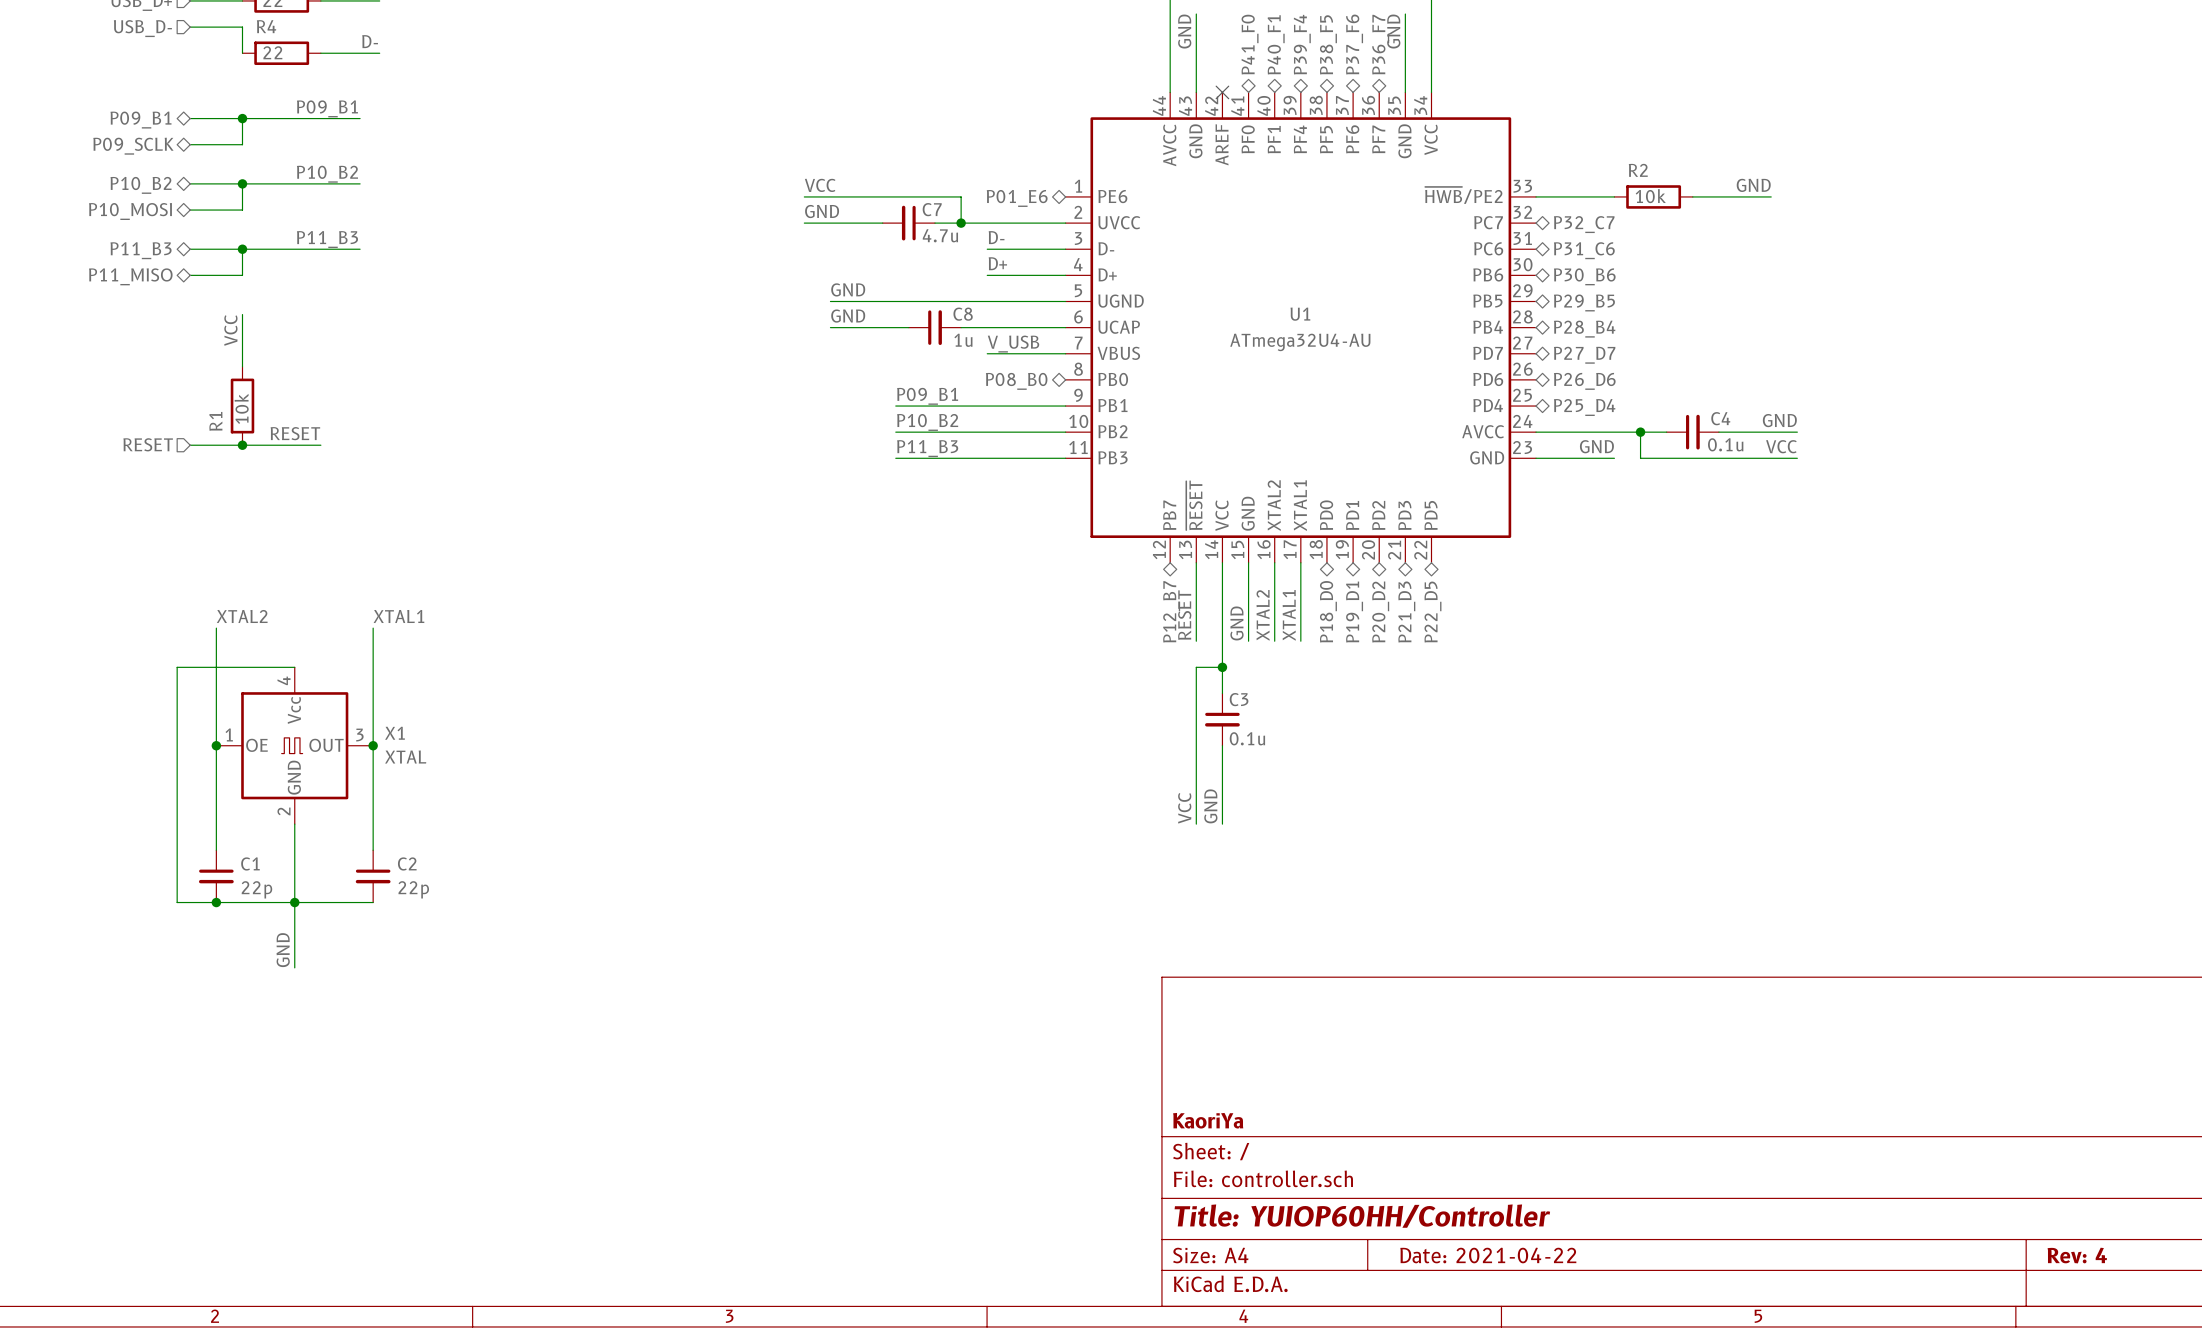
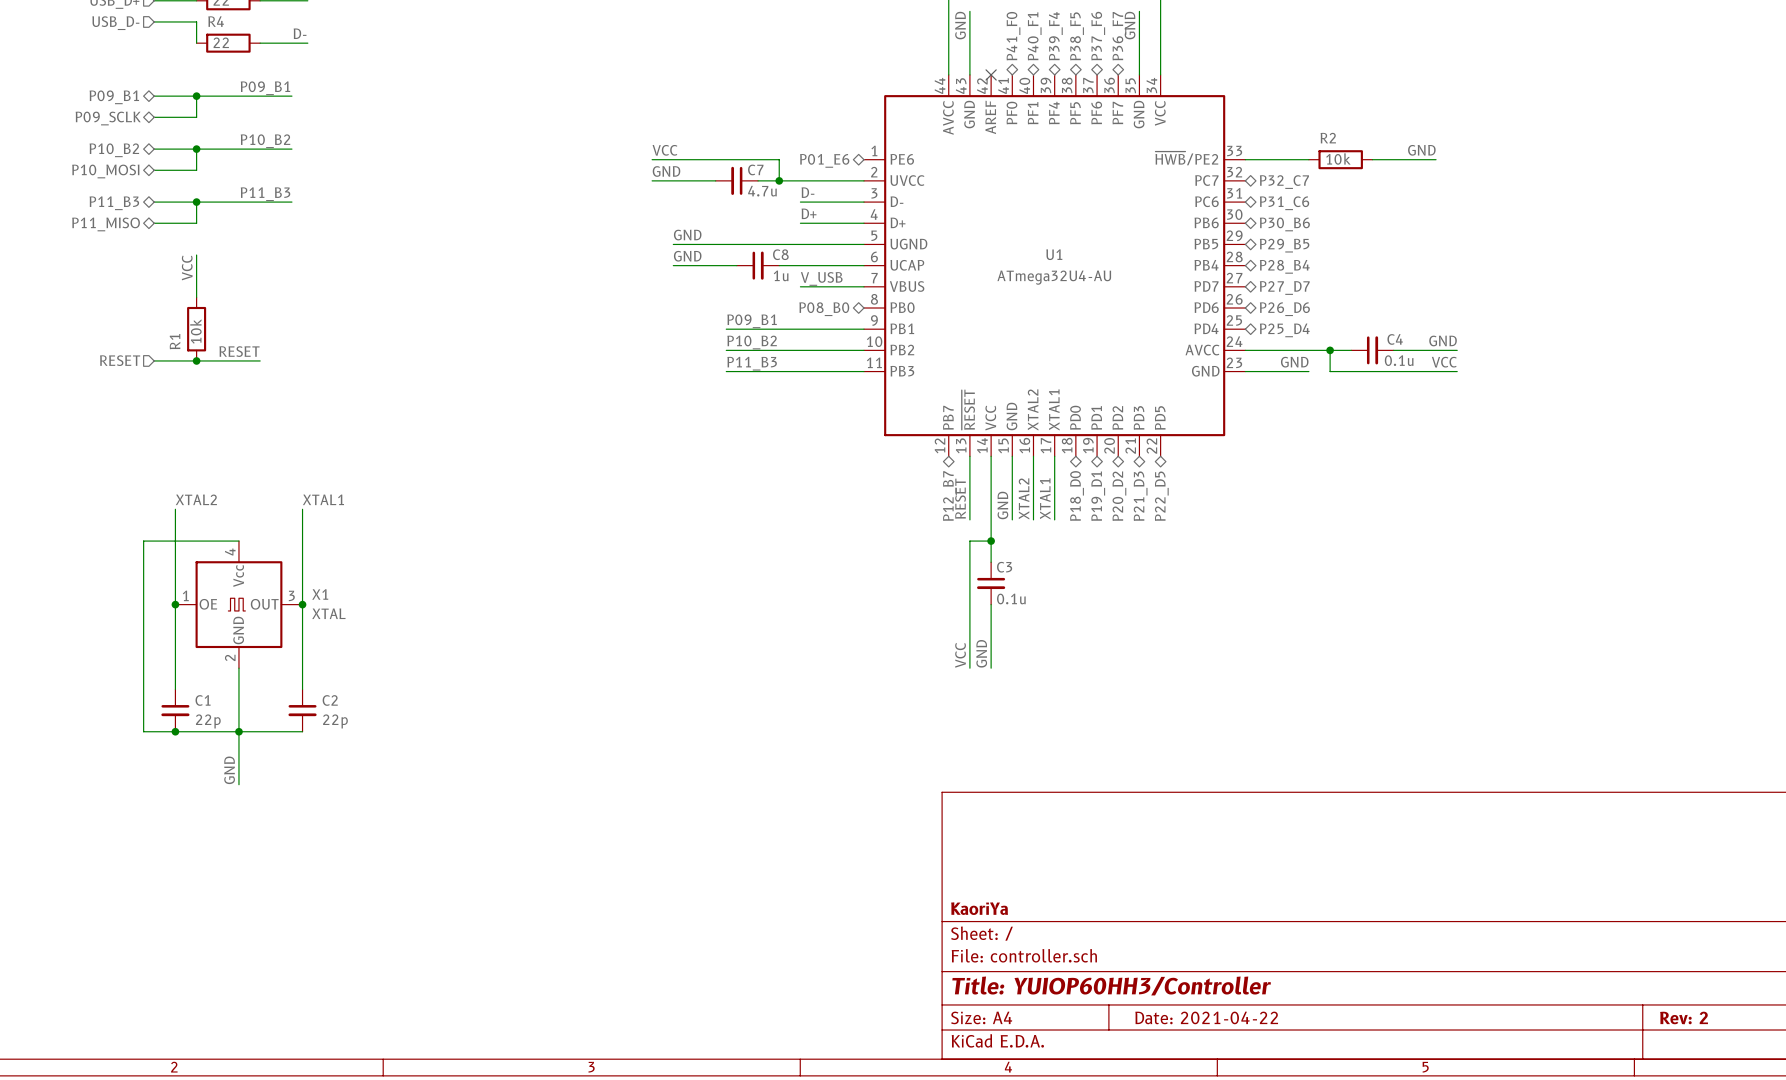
title block: Title: YUIOP60HH/Controller (1362, 1216) -> Title: YUIOP60HH3/Controller (1111, 985)
title block: Rev: 4 (2077, 1255) -> Rev: 2 (1684, 1018)

